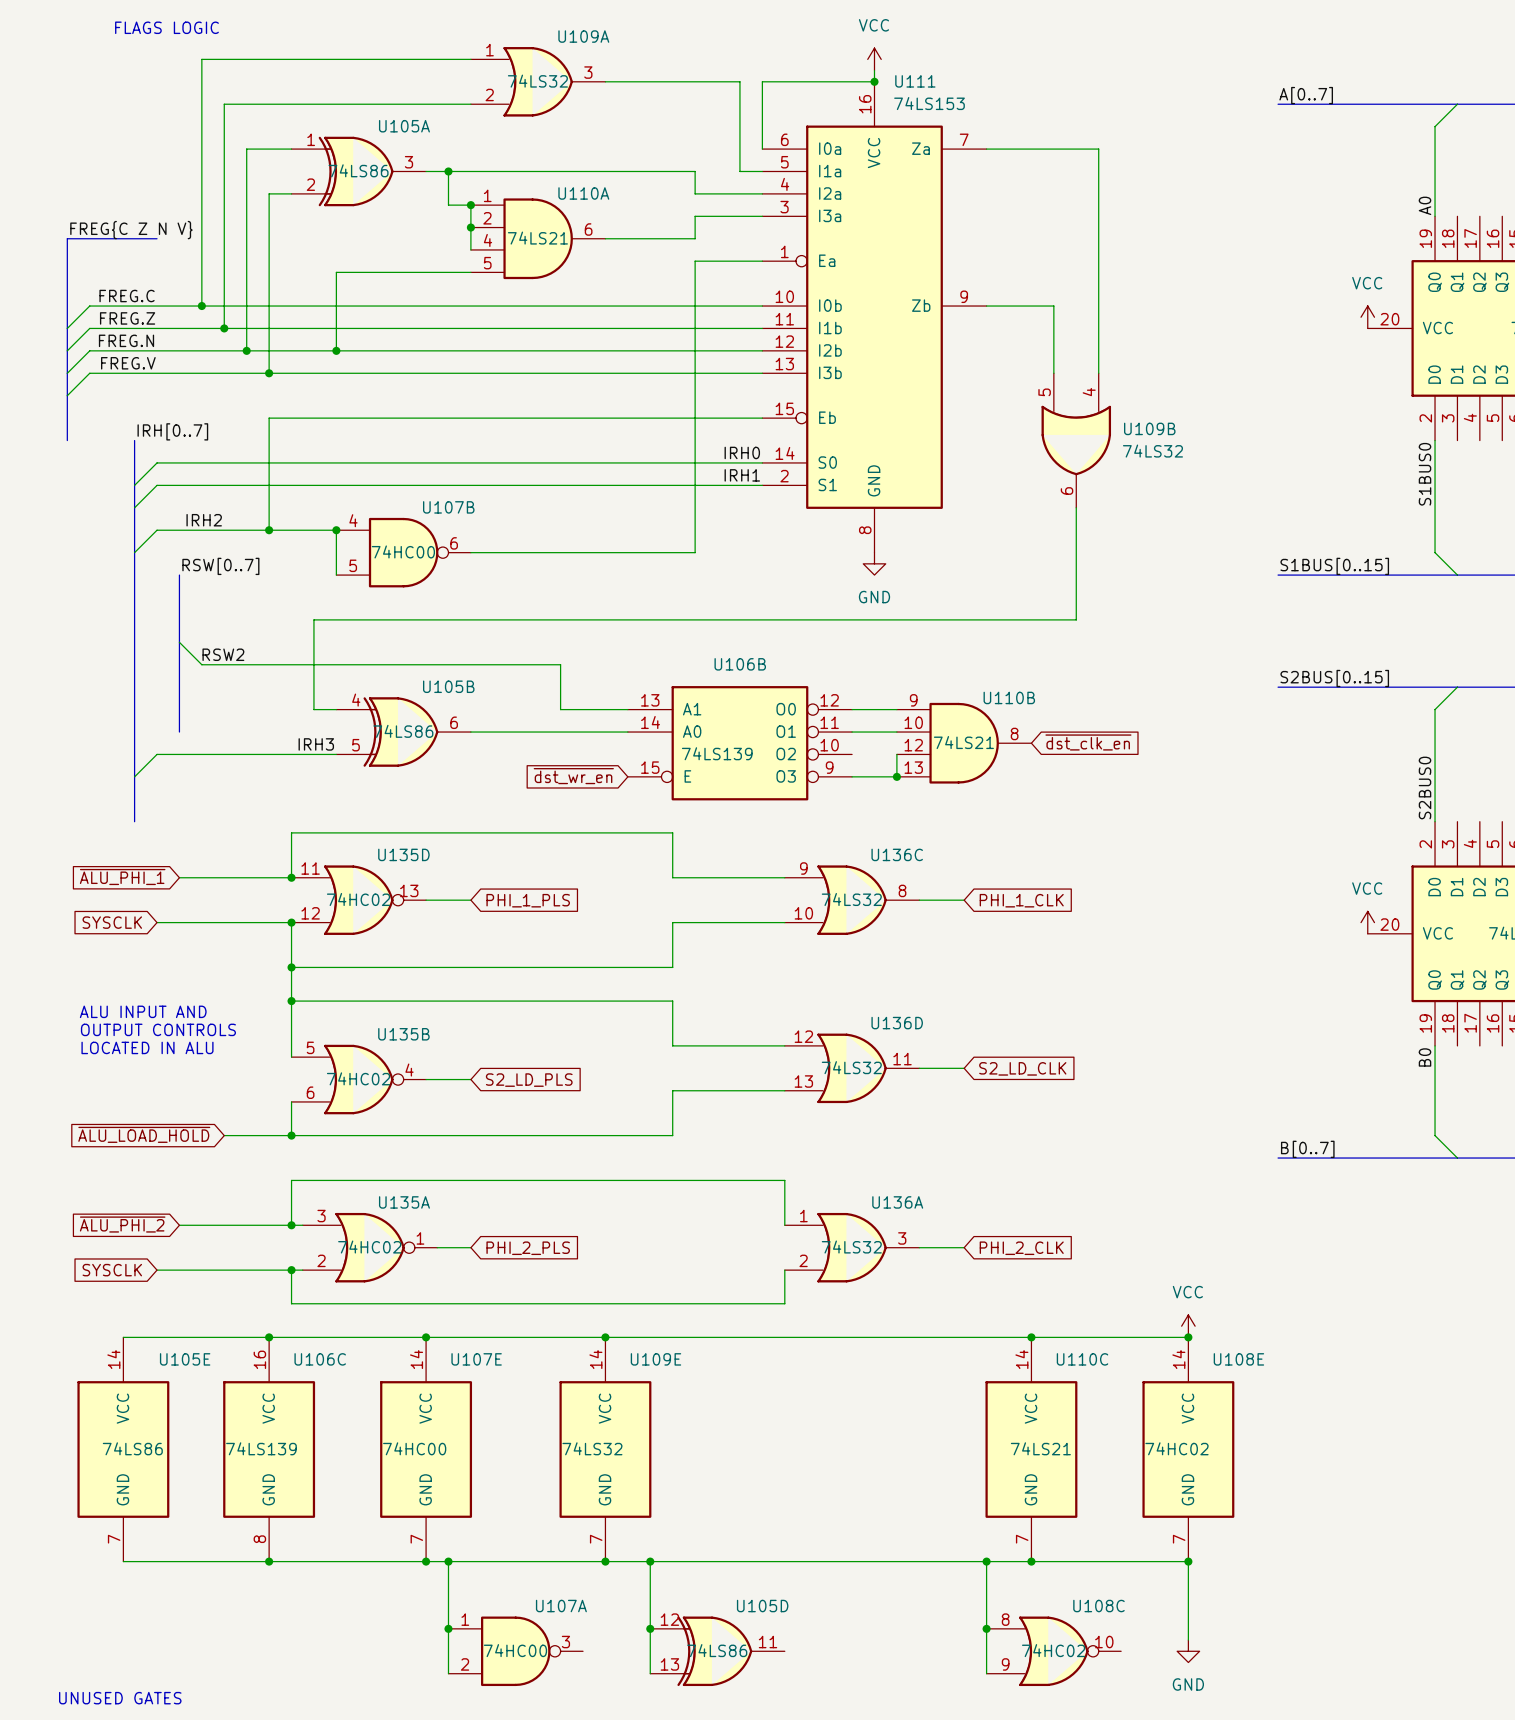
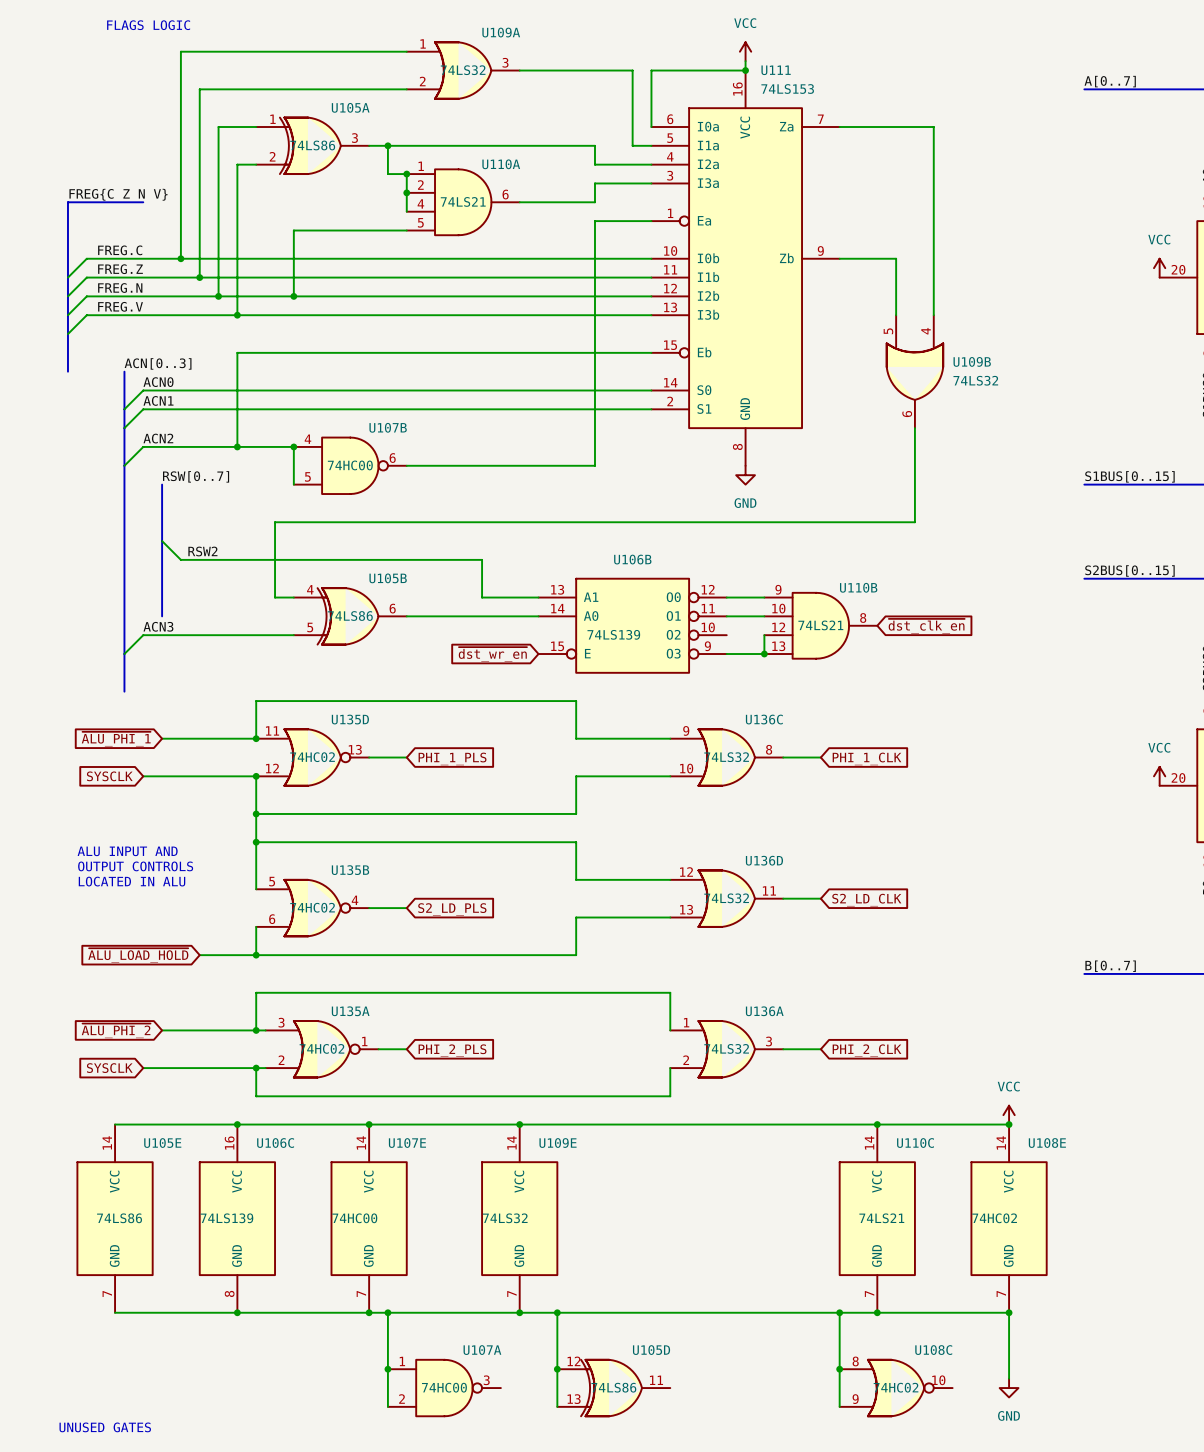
label: IRH[0..7] (172, 431) -> ACN[0..3] (158, 363)
label: none -> ACN0 (158, 382)
label: IRH0 (742, 452) -> none
label: none -> ACN1 (158, 400)
label: IRH1 (742, 475) -> none
label: none -> ACN2 (158, 438)
label: IRH2 (204, 520) -> none
label: none -> ACN3 (158, 626)
label: IRH3 (316, 744) -> none

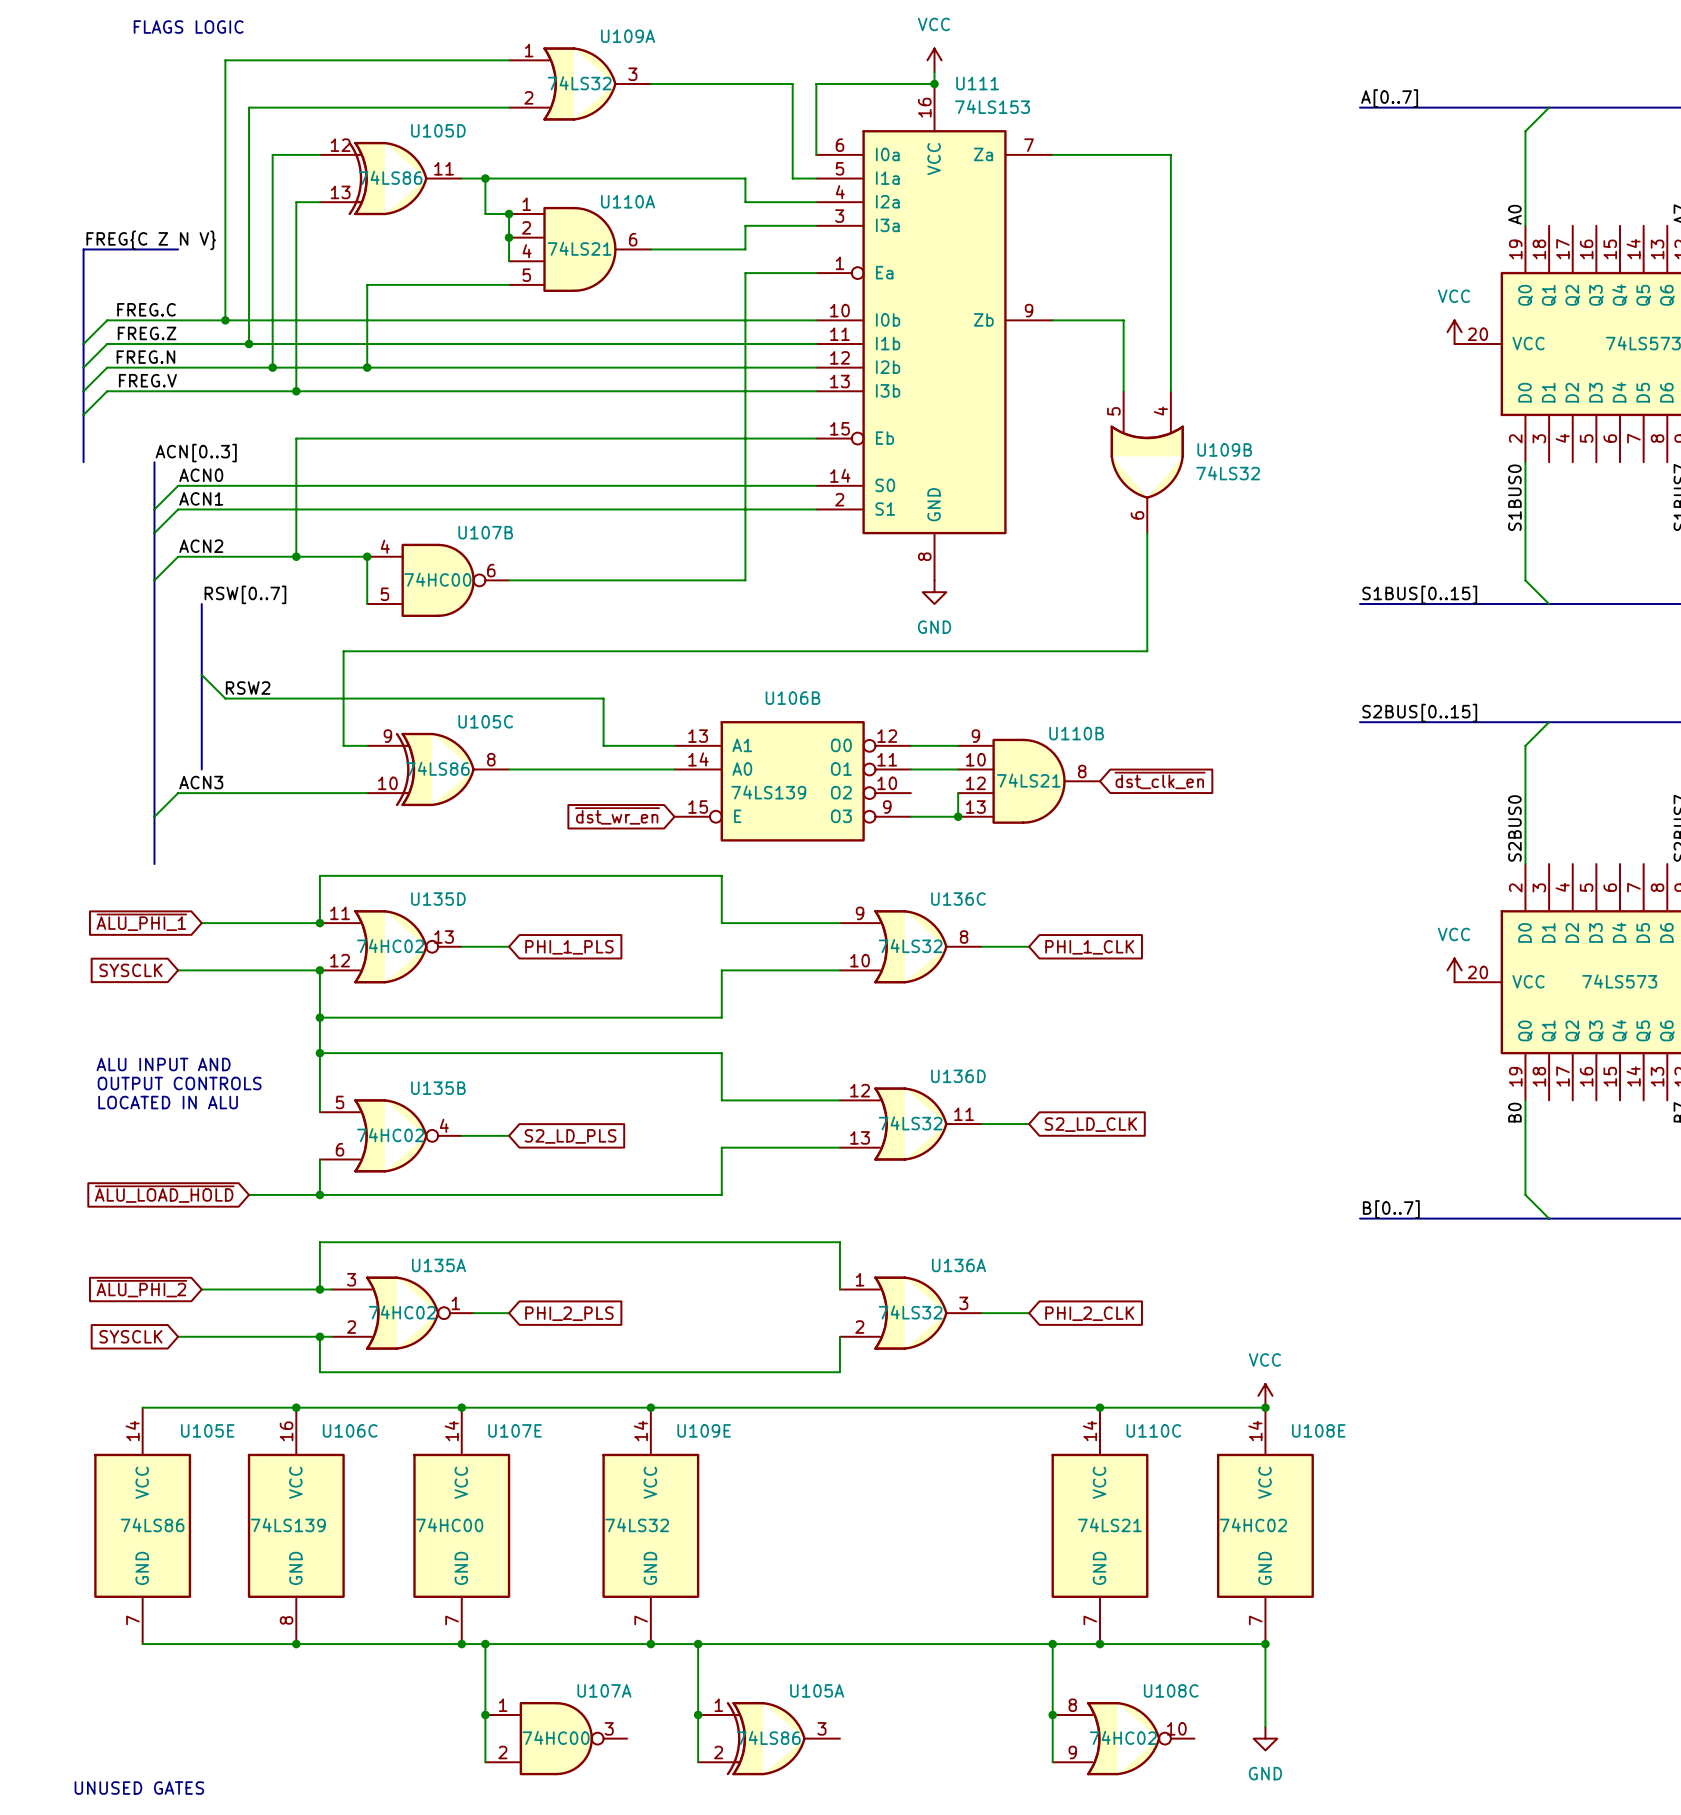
U105A position: (312, 145) -> (769, 1738)
U105B name: U105B (388, 578) -> U105C (485, 721)
U105B pin number: 4 (310, 589) -> 9 (387, 736)
U105B pin number: 6 (392, 608) -> 8 (491, 759)
U105B pin number: 5 (310, 627) -> 10 (387, 783)
U105D position: (613, 1388) -> (390, 178)

